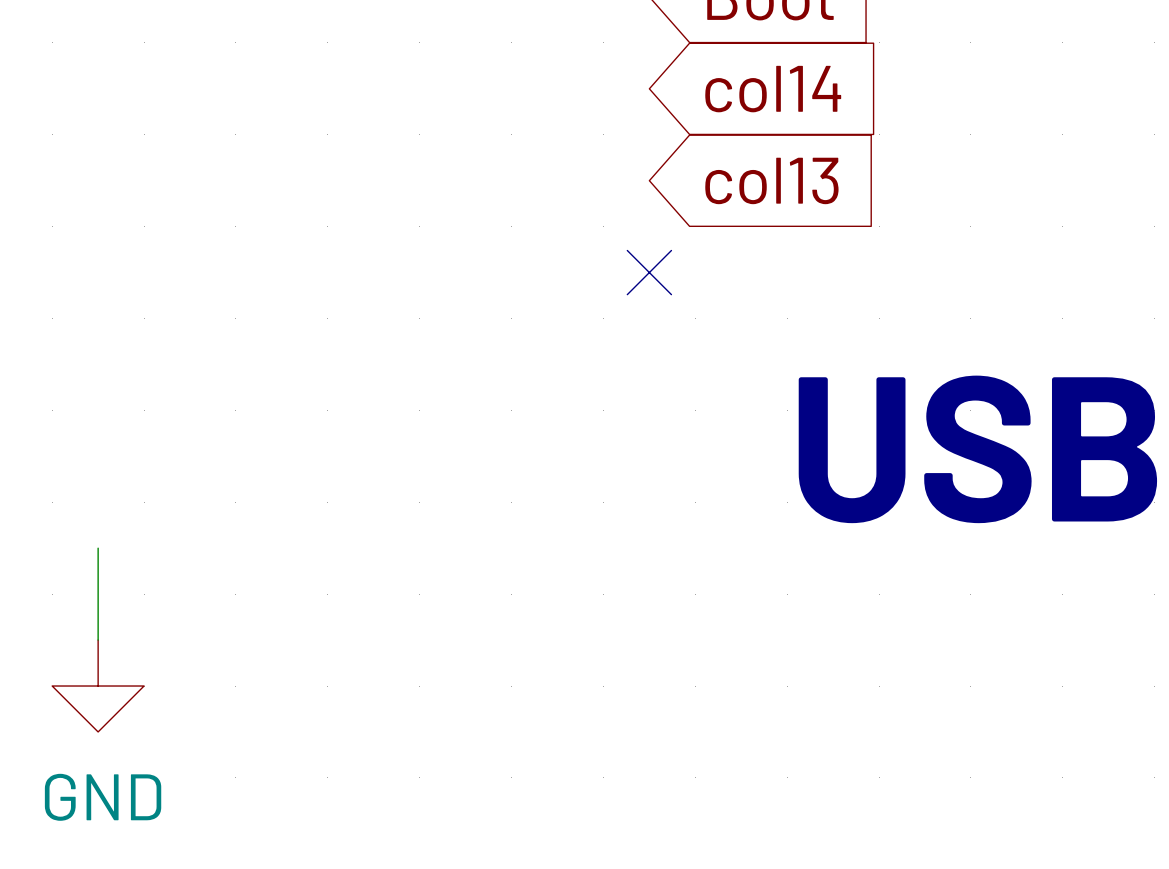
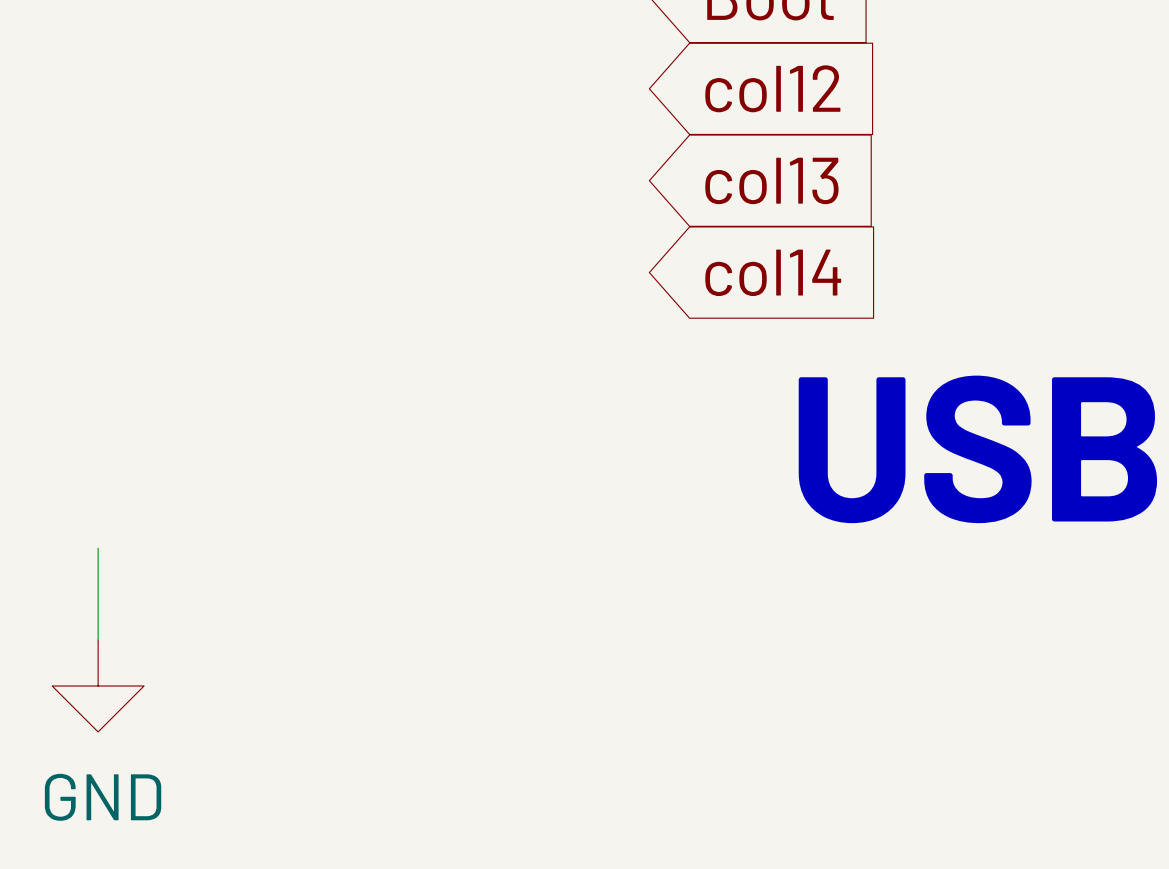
global label: col14 (773, 89) -> col12 (772, 88)
no-connect mark: (649, 272) -> none
global label: none -> col14 (773, 272)

